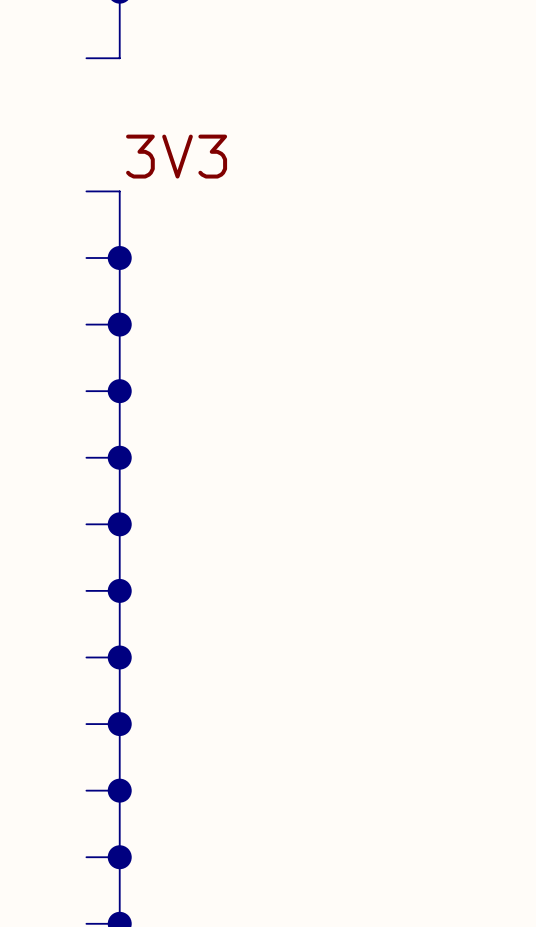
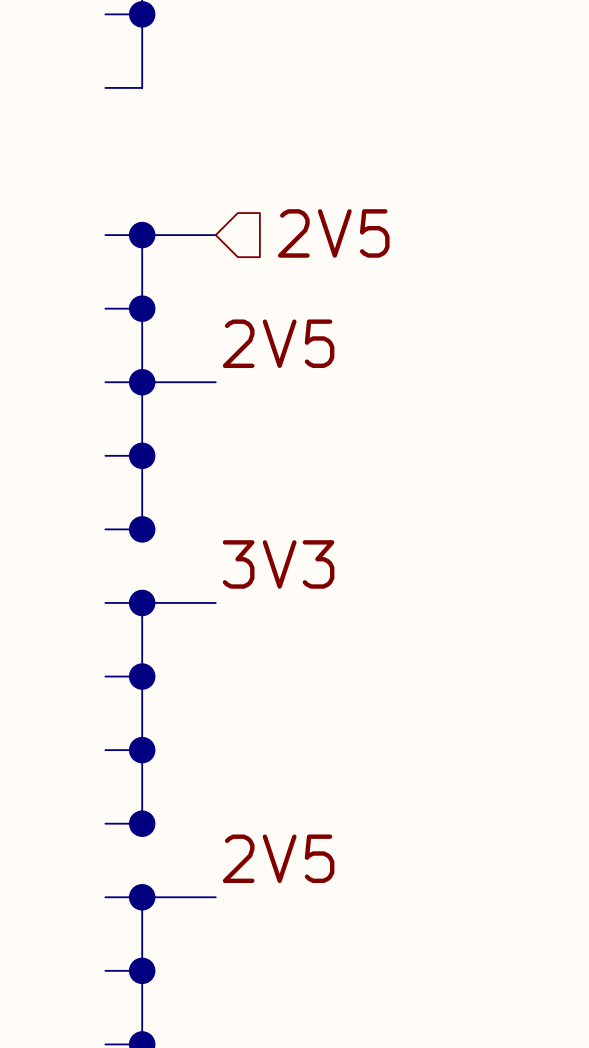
label position: 3V3 (176, 156) -> 3V3 (278, 564)
hierarchical label: none -> 2V5 (333, 233)
wire: none -> (142, 235) (215, 235)
junction: none -> (142, 235)
label: none -> 2V5 (278, 343)
wire: none -> (142, 382) (215, 382)
wire: (119, 457) (119, 524) -> (215, 602) (142, 602)
wire: (119, 724) (119, 790) -> (215, 897) (142, 897)
label: none -> 2V5 (278, 858)

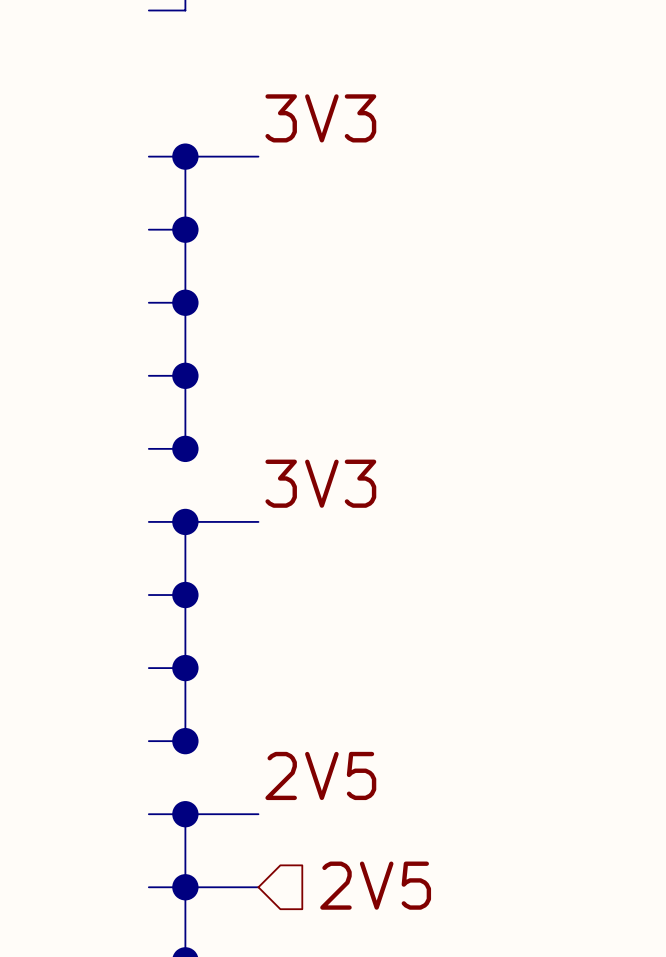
label: none -> 3V3 (320, 118)
hierarchical label: 2V5 (333, 233) -> none
label: 2V5 (278, 343) -> none
wire: (142, 382) (215, 382) -> (185, 887) (258, 887)
hierarchical label: none -> 2V5 (375, 885)

